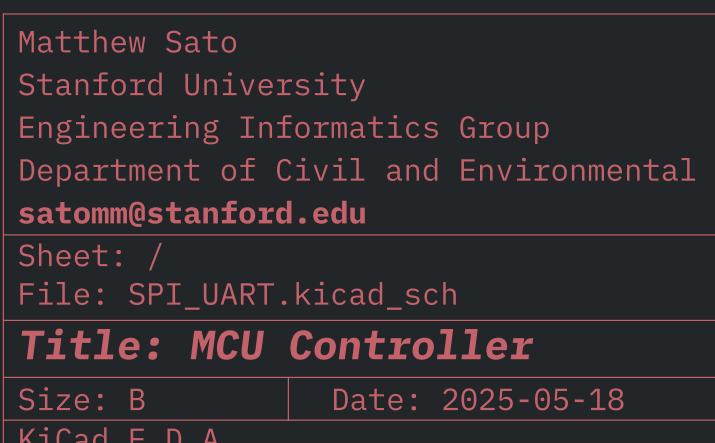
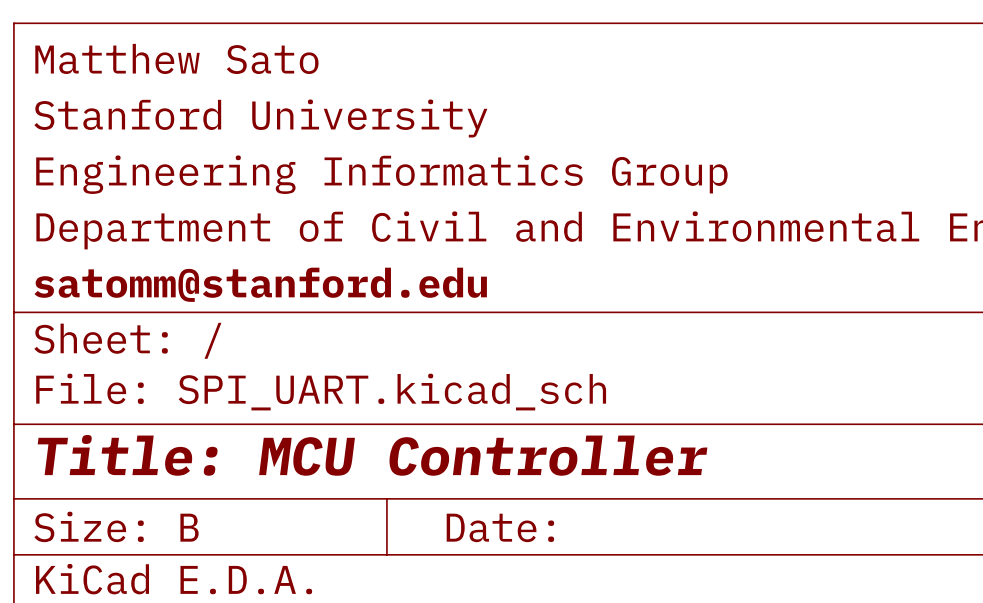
title block: Date: 2025-05-18 (478, 399) -> Date: (500, 527)

